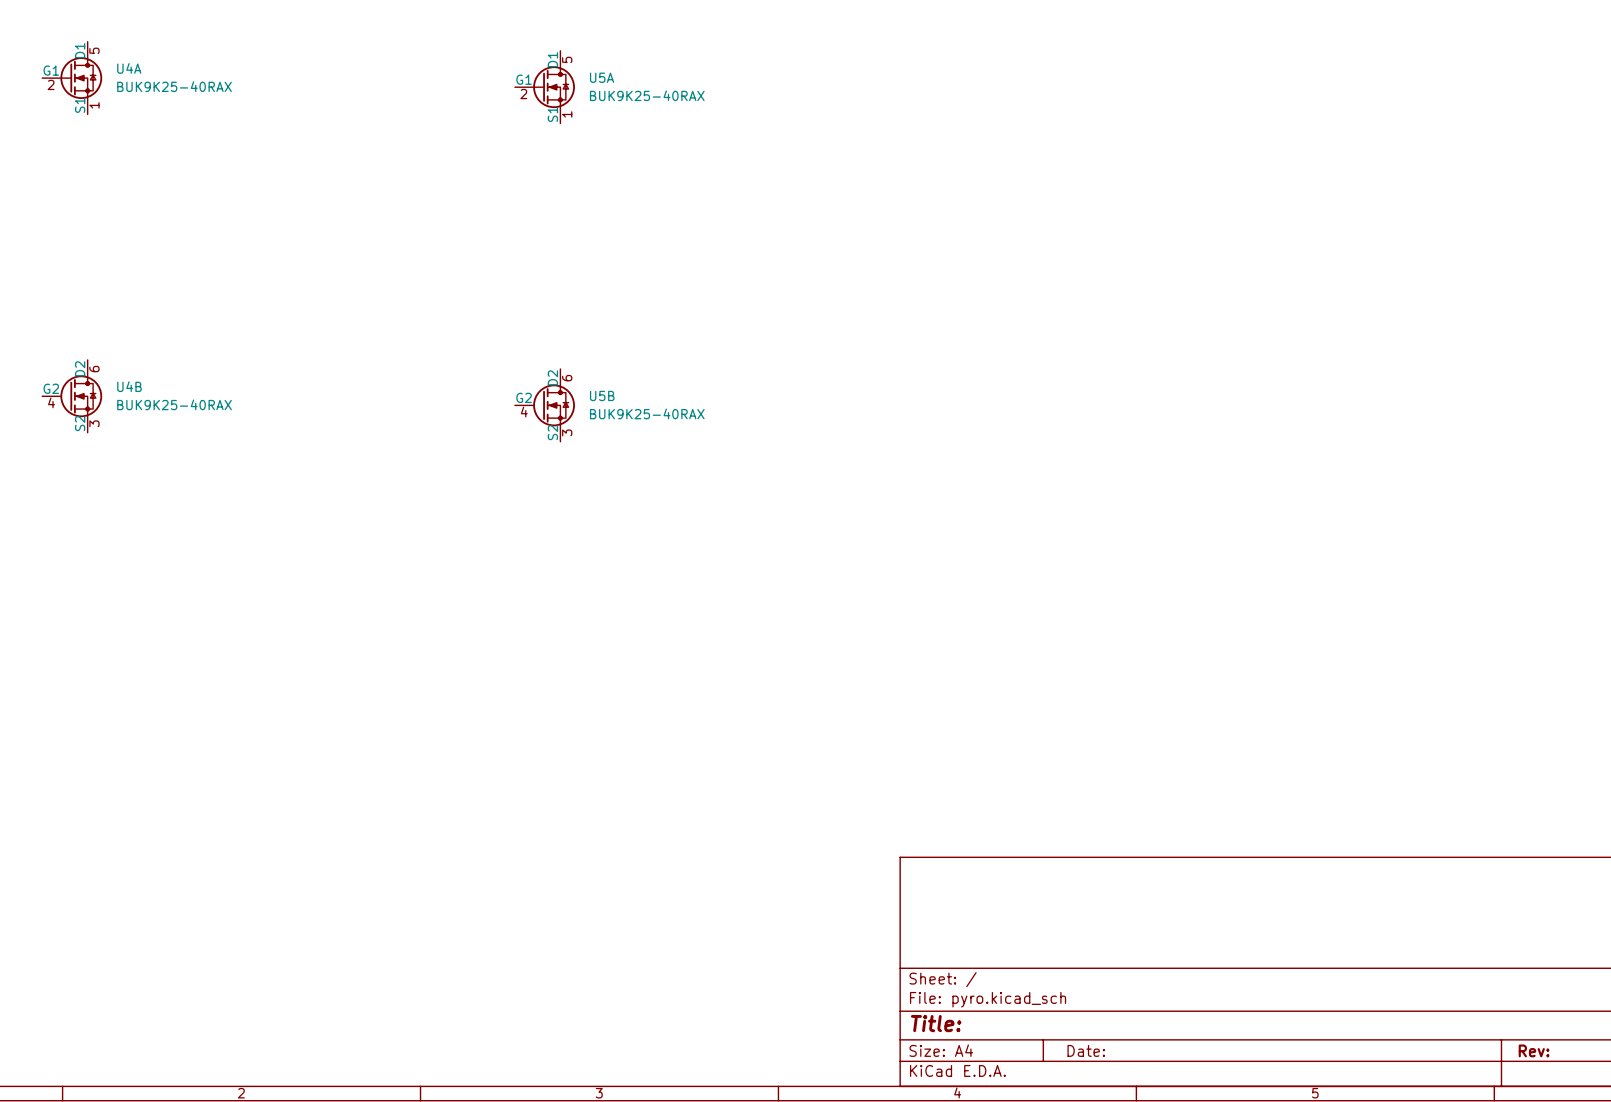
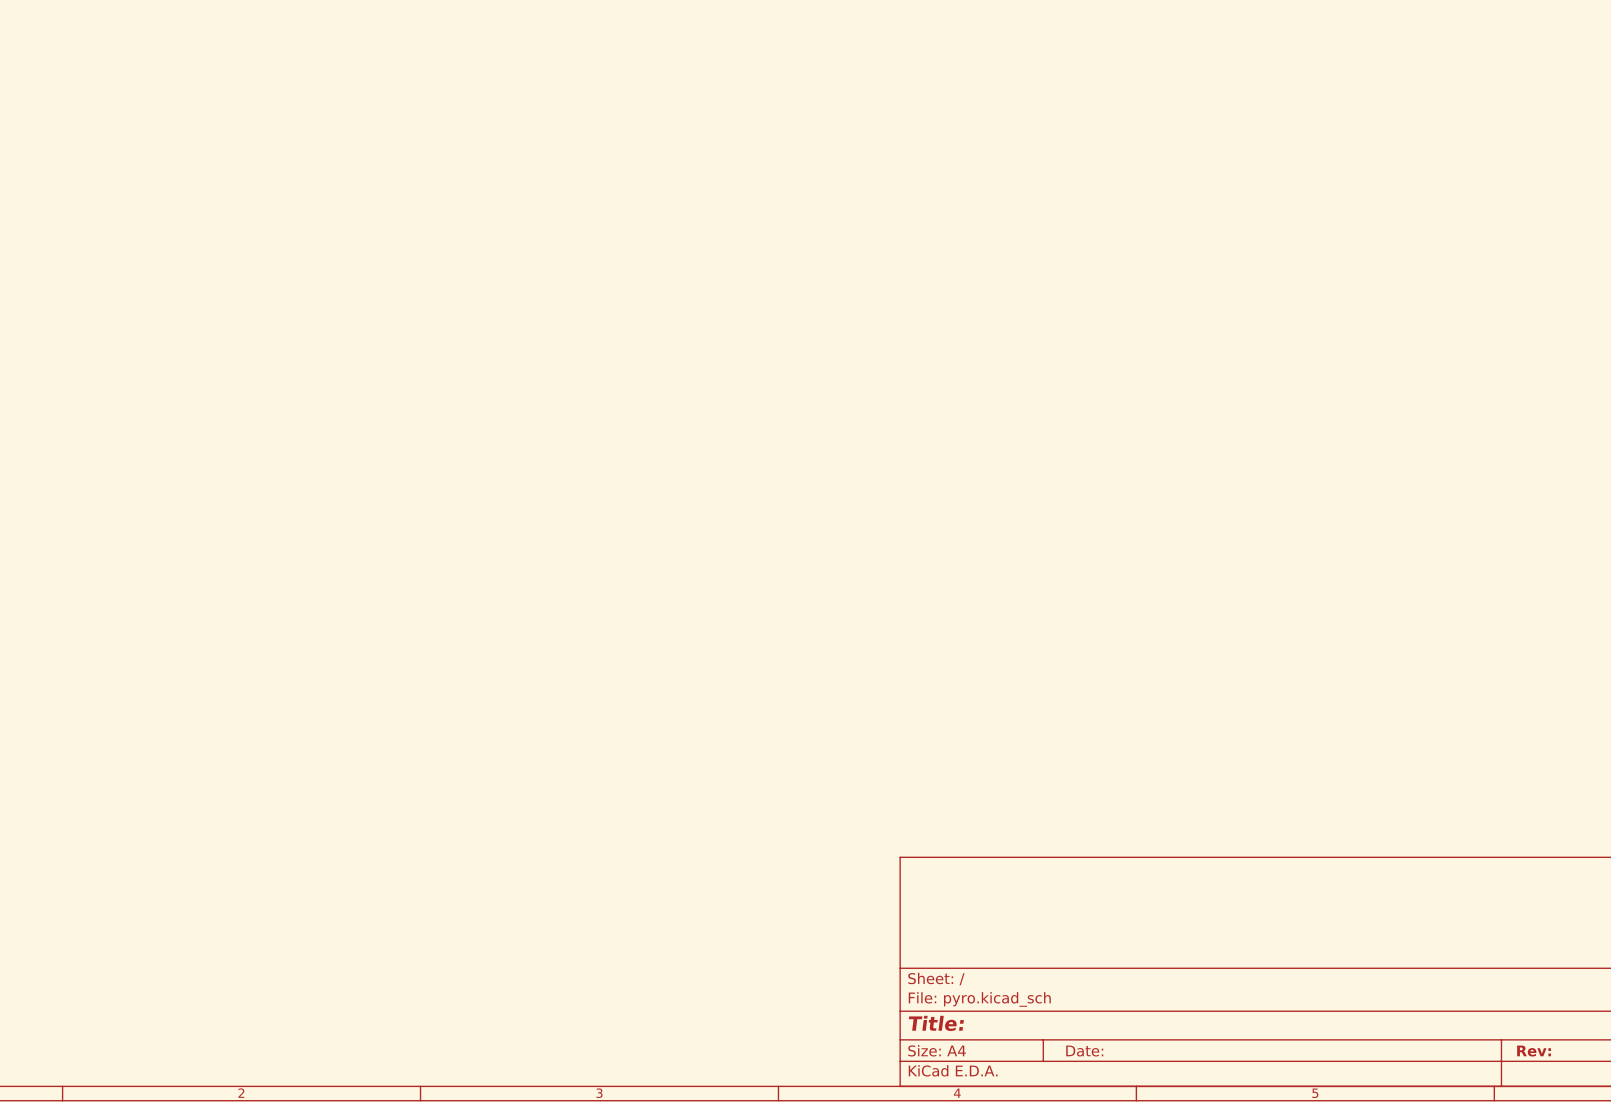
U4A: BUK9K25-40RAX (72, 78) -> none
U5A: BUK9K25-40RAX (544, 87) -> none
U4B: BUK9K25-40RAX (72, 396) -> none
U5B: BUK9K25-40RAX (544, 405) -> none

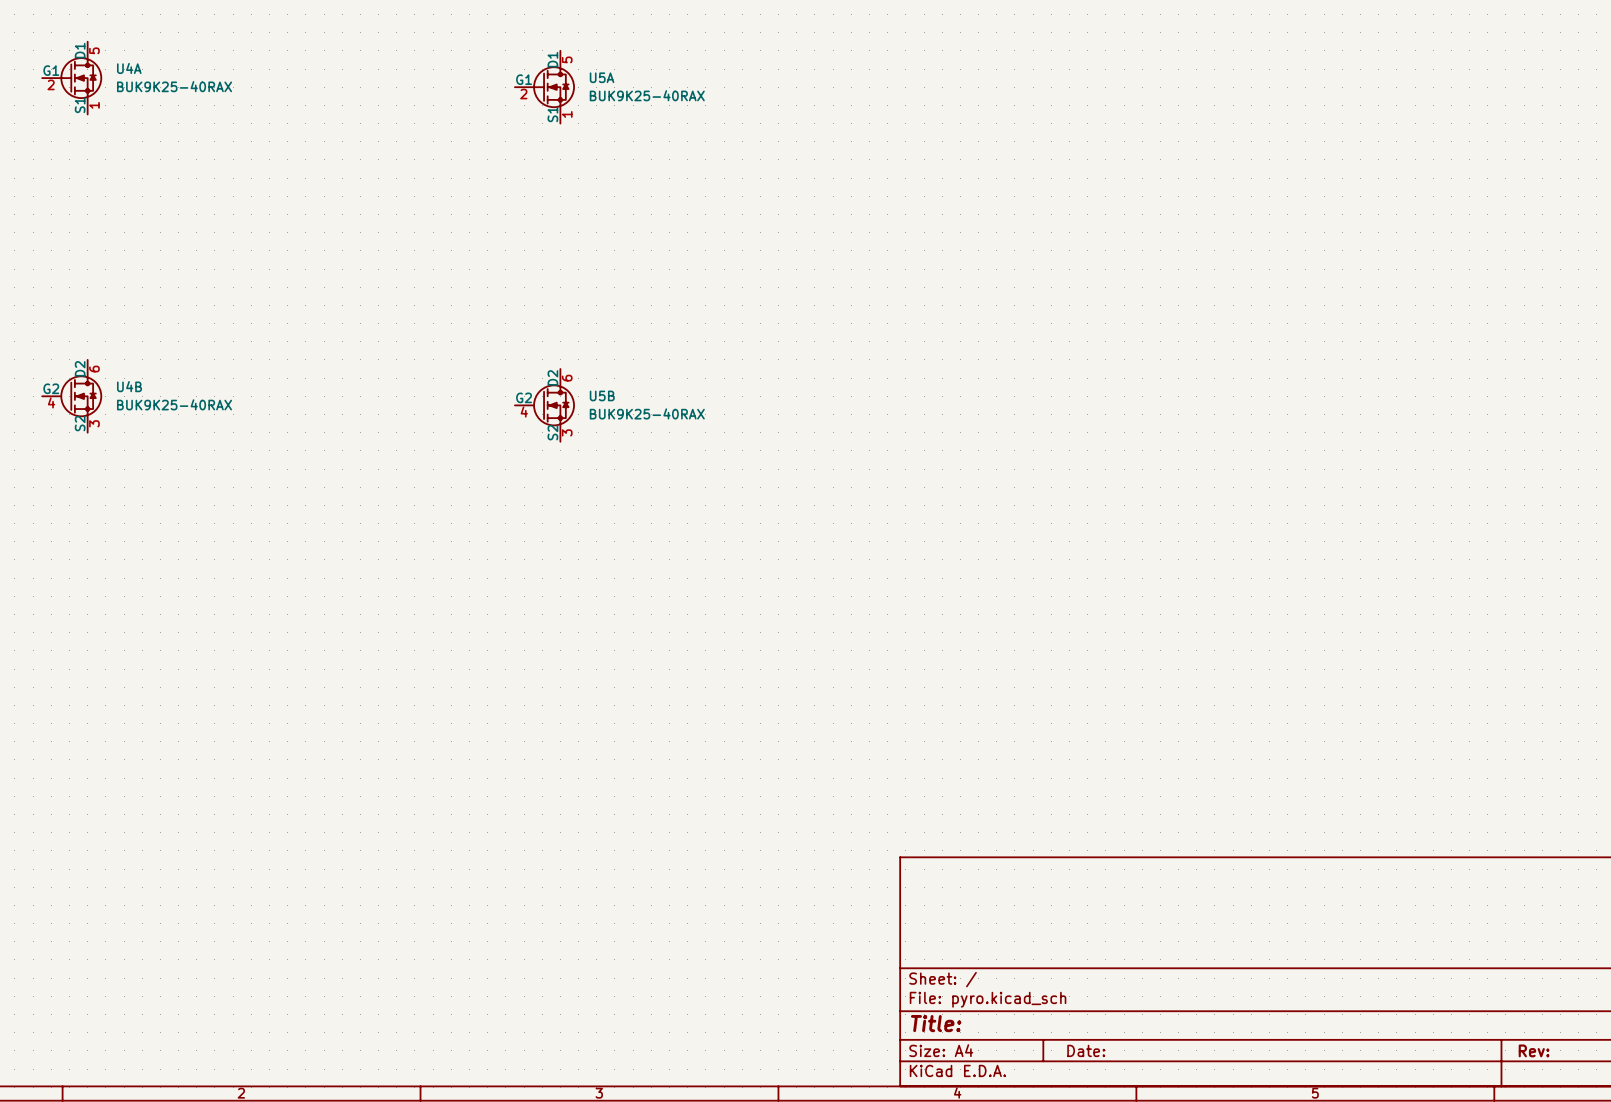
U4A: none -> BUK9K25-40RAX (72, 78)
U5A: none -> BUK9K25-40RAX (544, 87)
U4B: none -> BUK9K25-40RAX (72, 396)
U5B: none -> BUK9K25-40RAX (544, 405)

